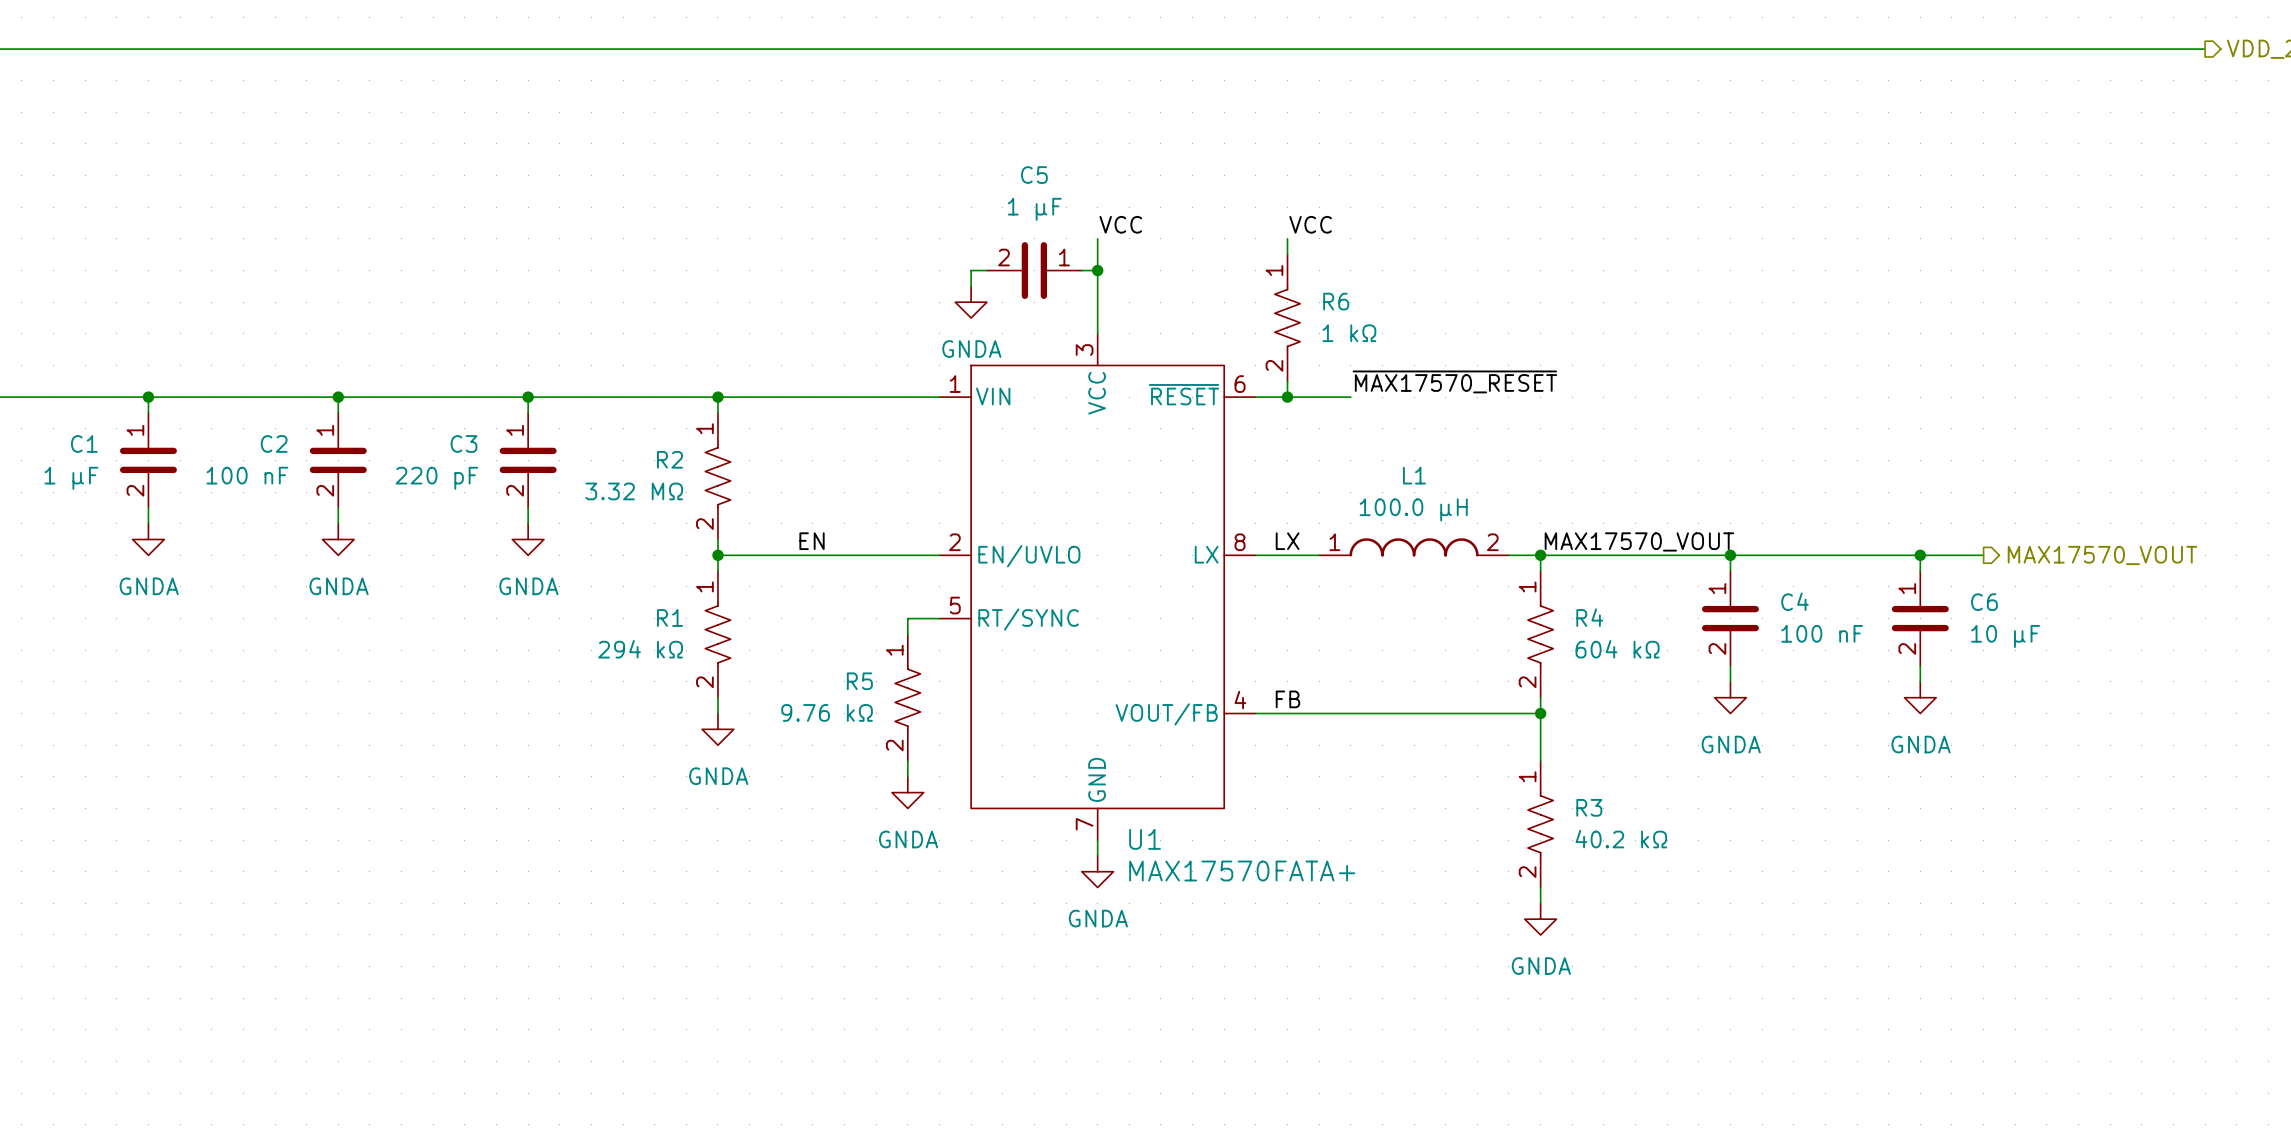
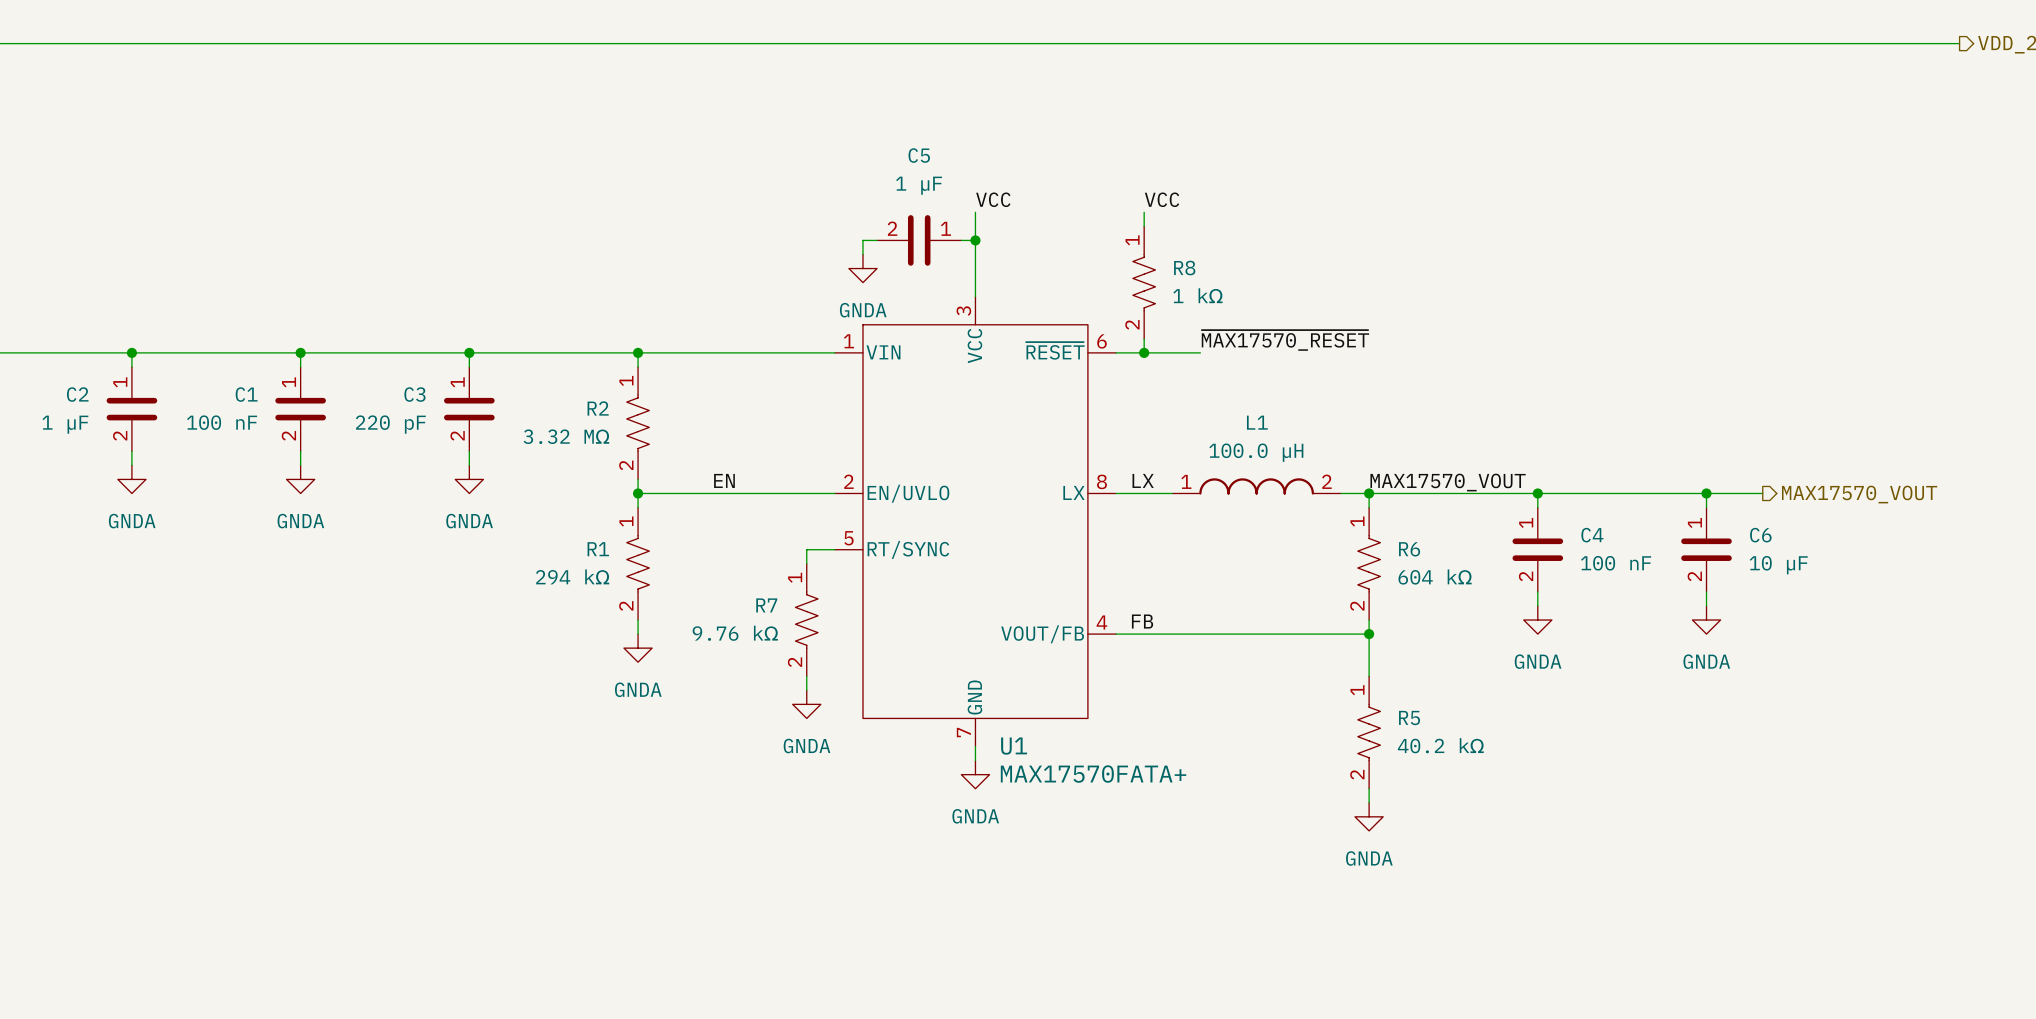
R6 name: R6 (1336, 301) -> R8 (1184, 268)
C1 name: C1 (84, 443) -> C2 (77, 394)
C2 name: C2 (274, 443) -> C1 (246, 394)
R4 name: R4 (1589, 617) -> R6 (1409, 549)
R5 name: R5 (859, 681) -> R7 (766, 605)
R3 name: R3 (1589, 807) -> R5 (1409, 718)

